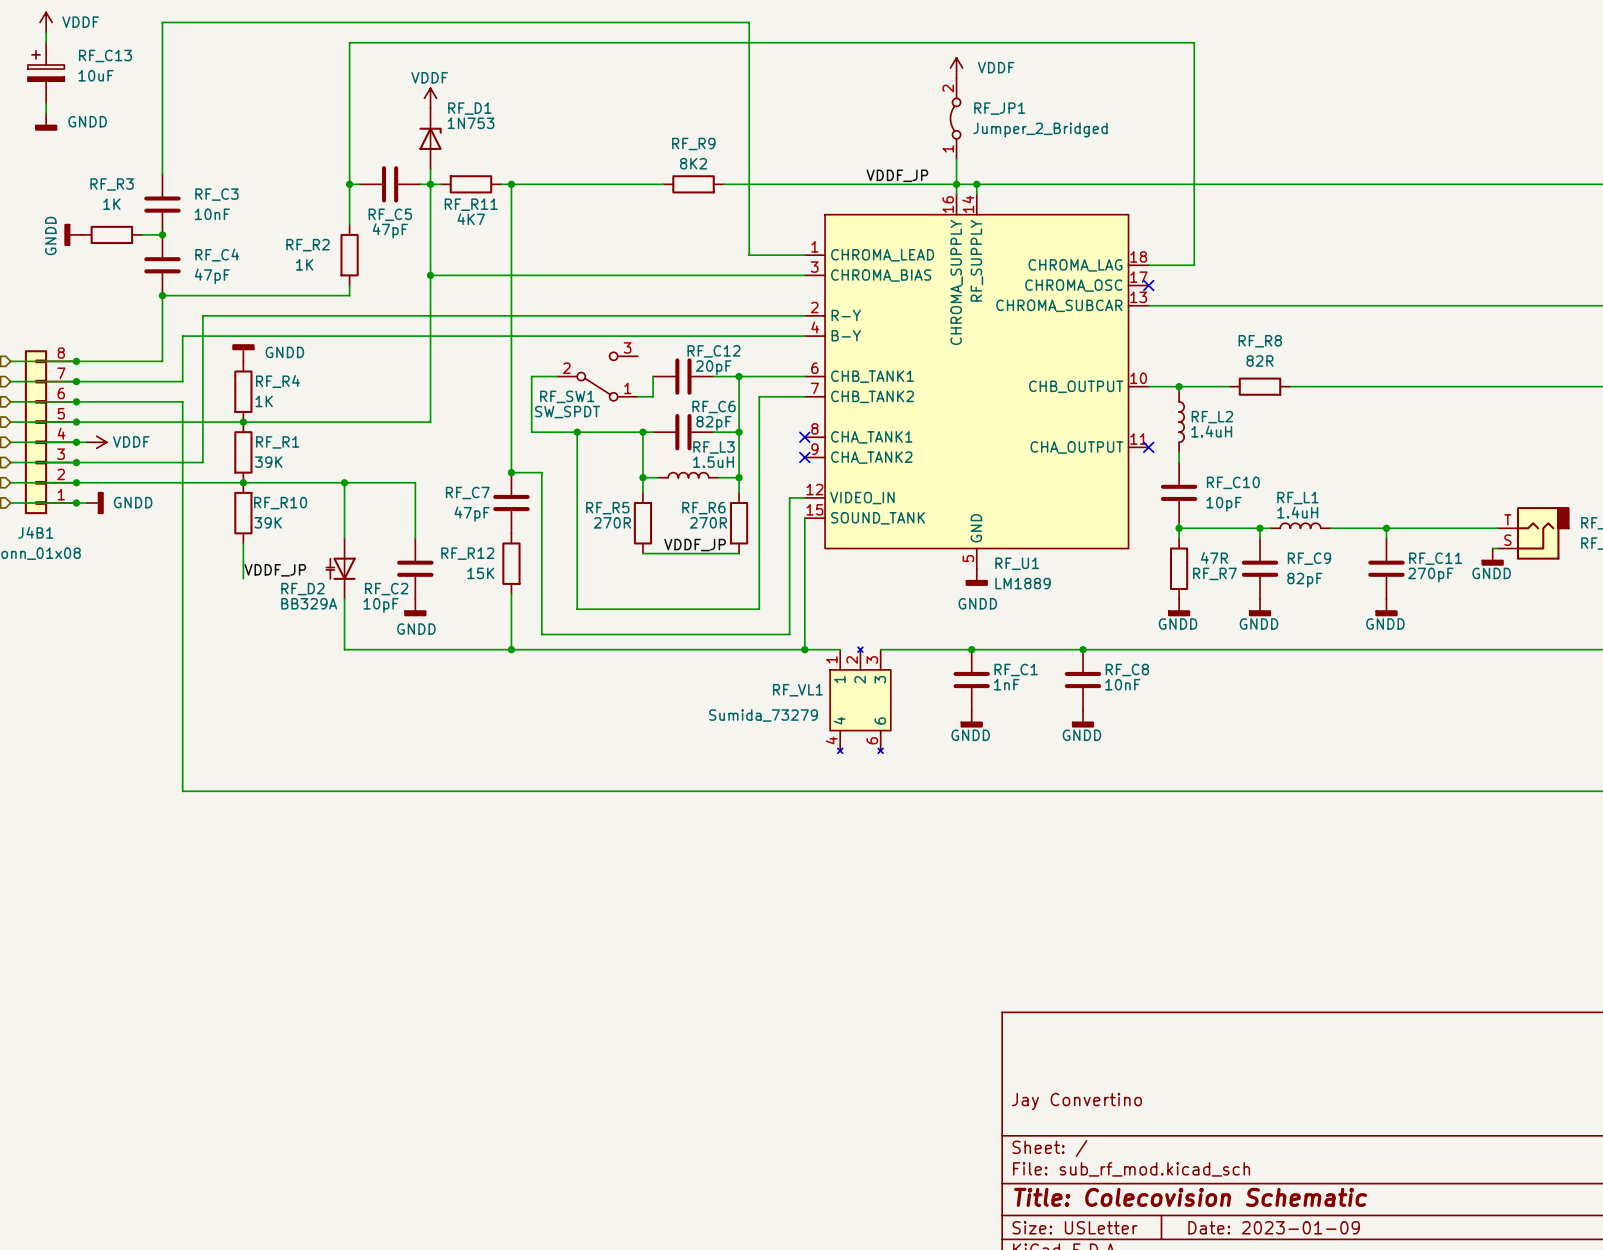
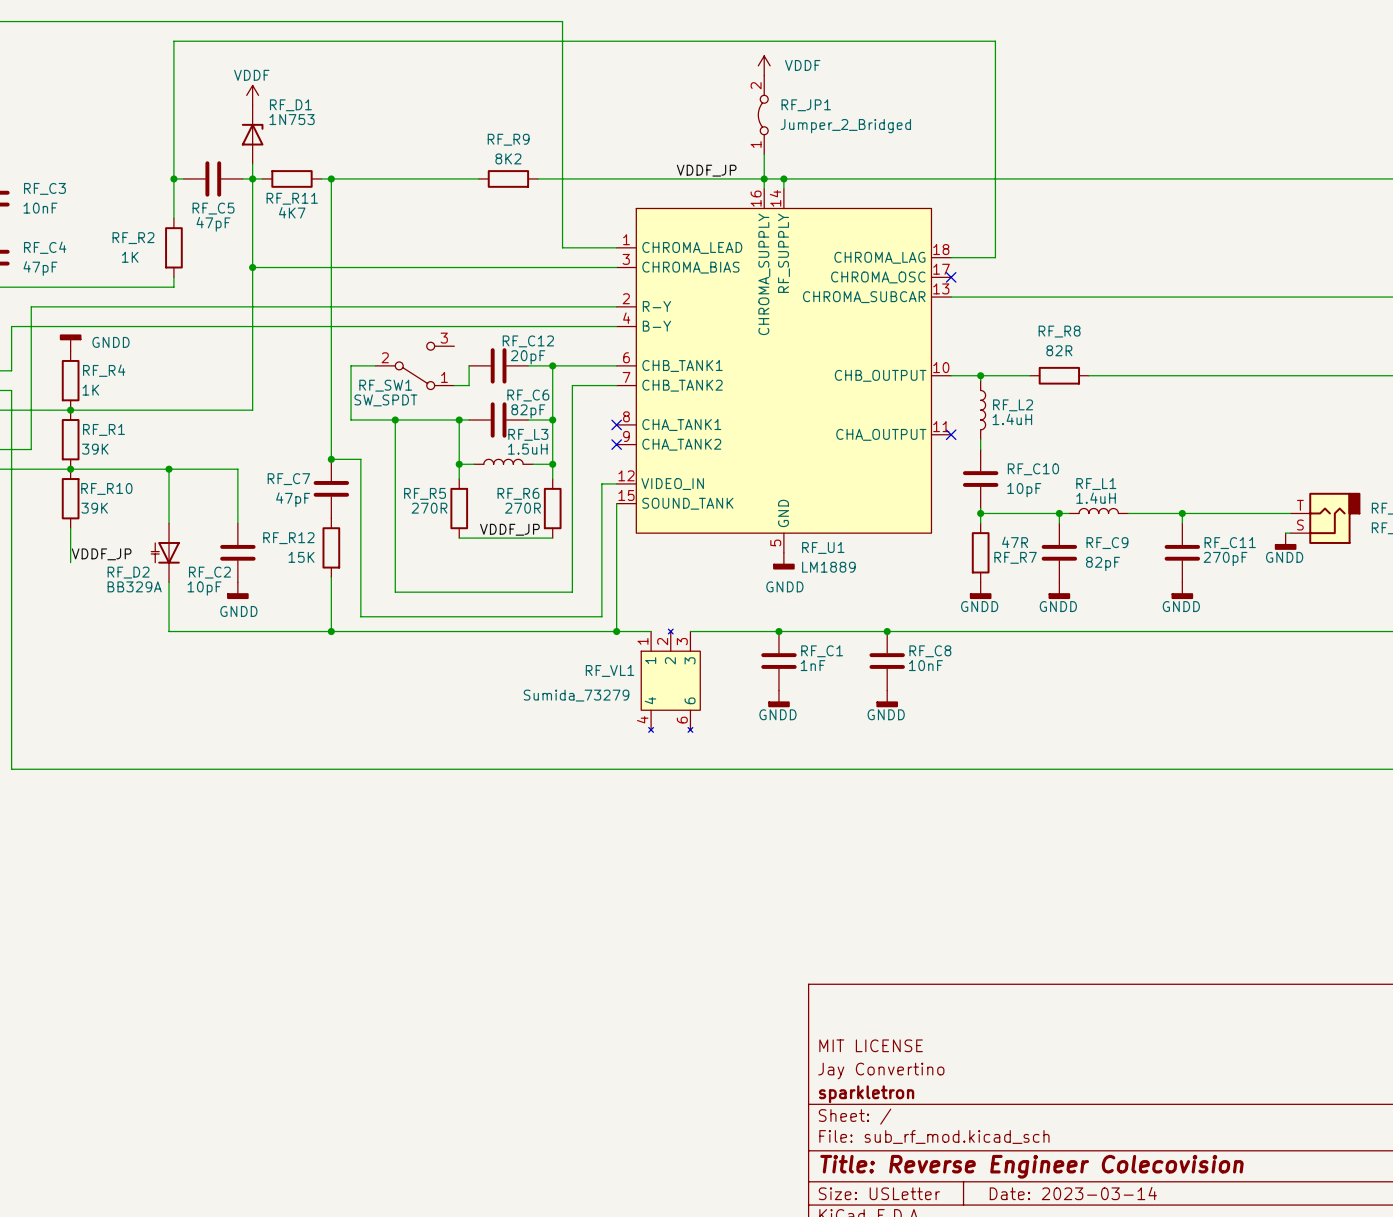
title block: none -> MIT LICENSE (871, 1045)
title block: none -> sparkletron (866, 1094)
title block: Title: Colecovision Schematic (1190, 1197) -> Title: Reverse Engineer Colecovision (1031, 1166)
title block: Date: 2023-01-09 (1274, 1227) -> Date: 2023-03-14 (1073, 1193)

